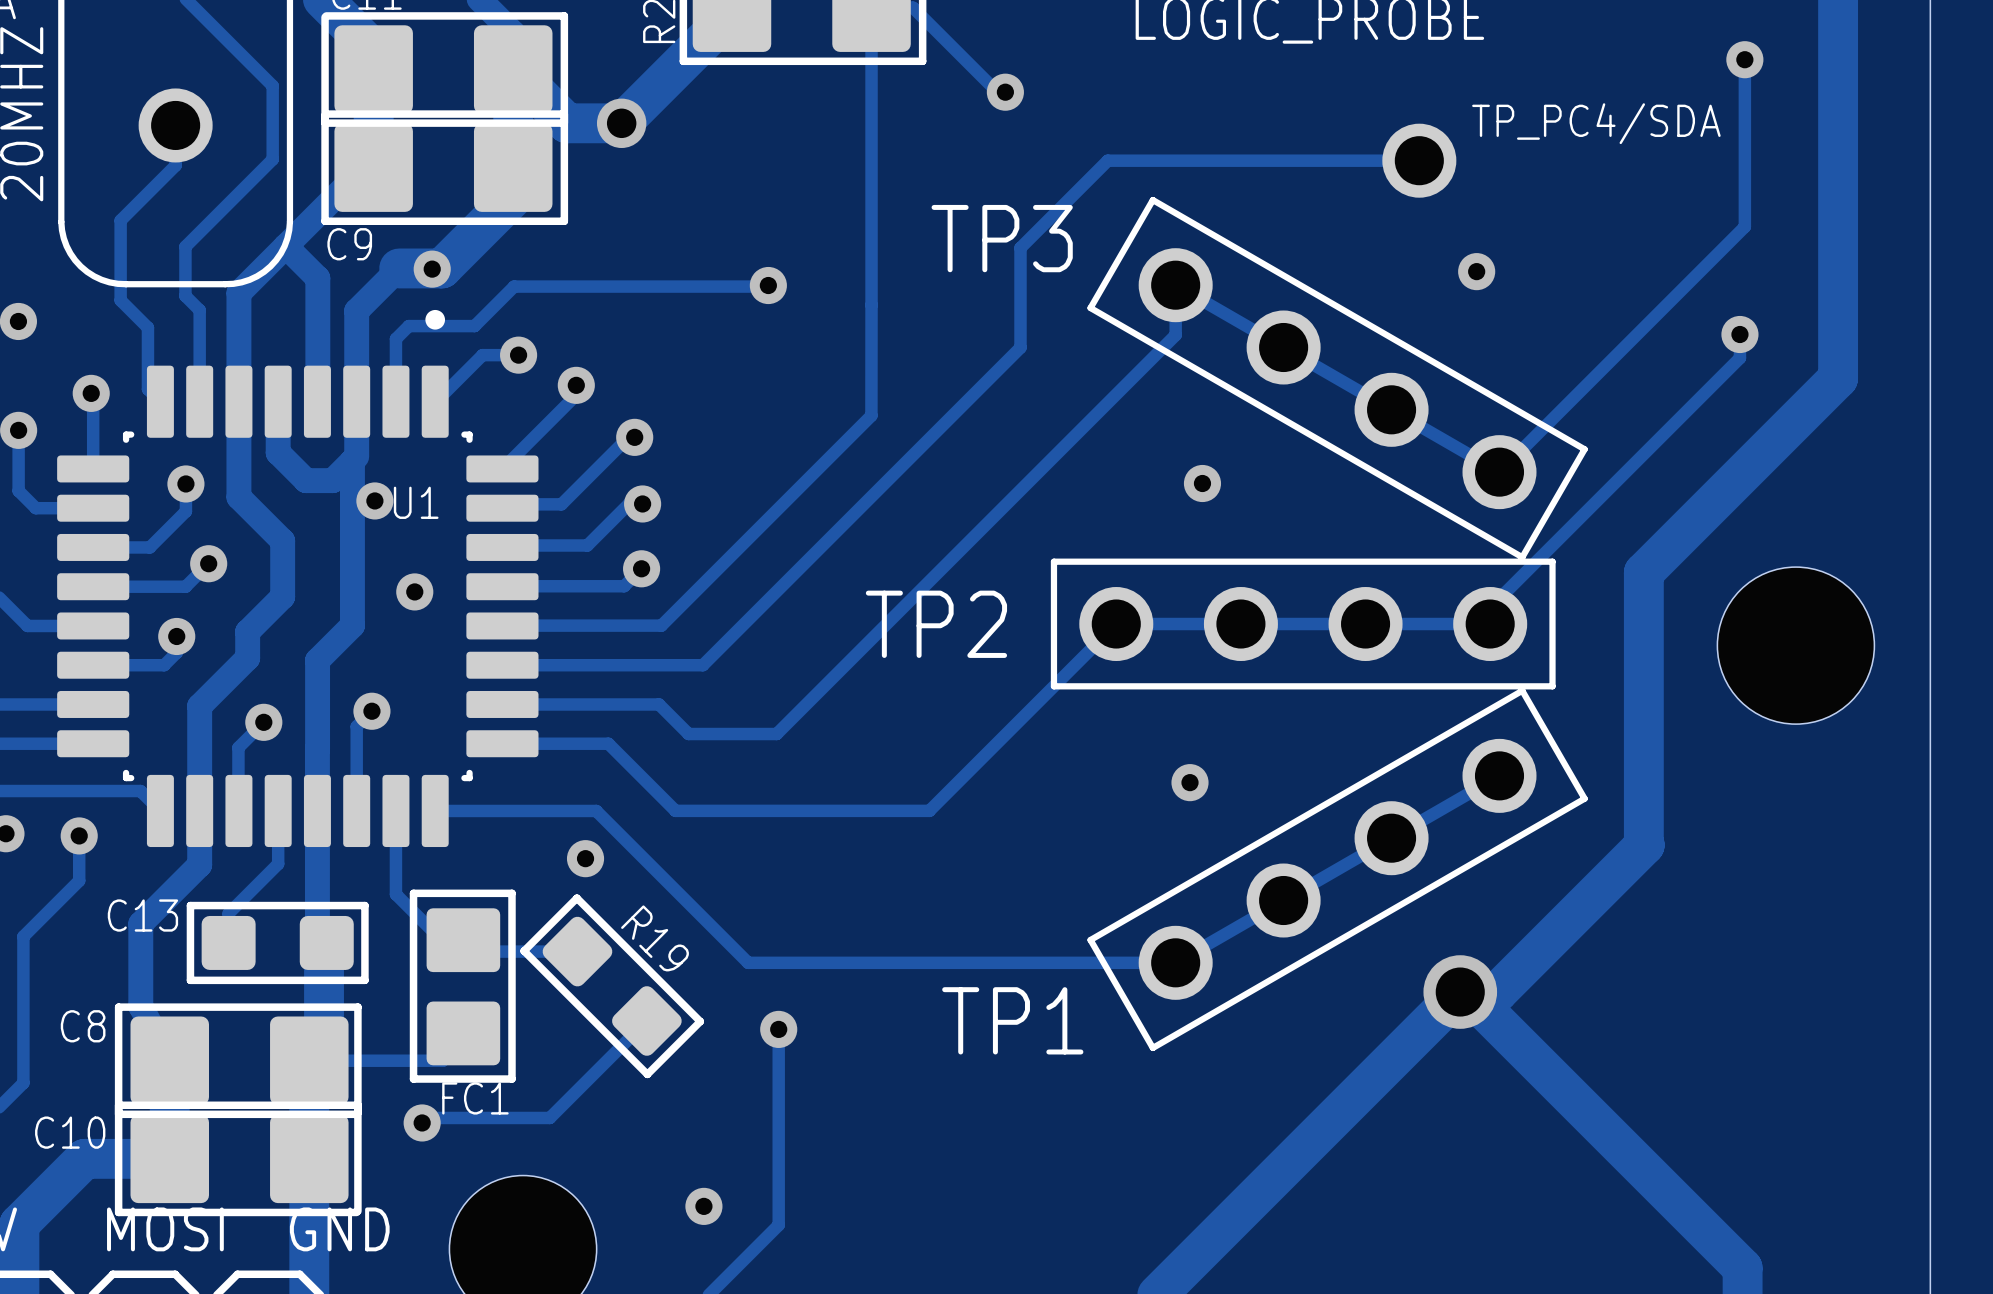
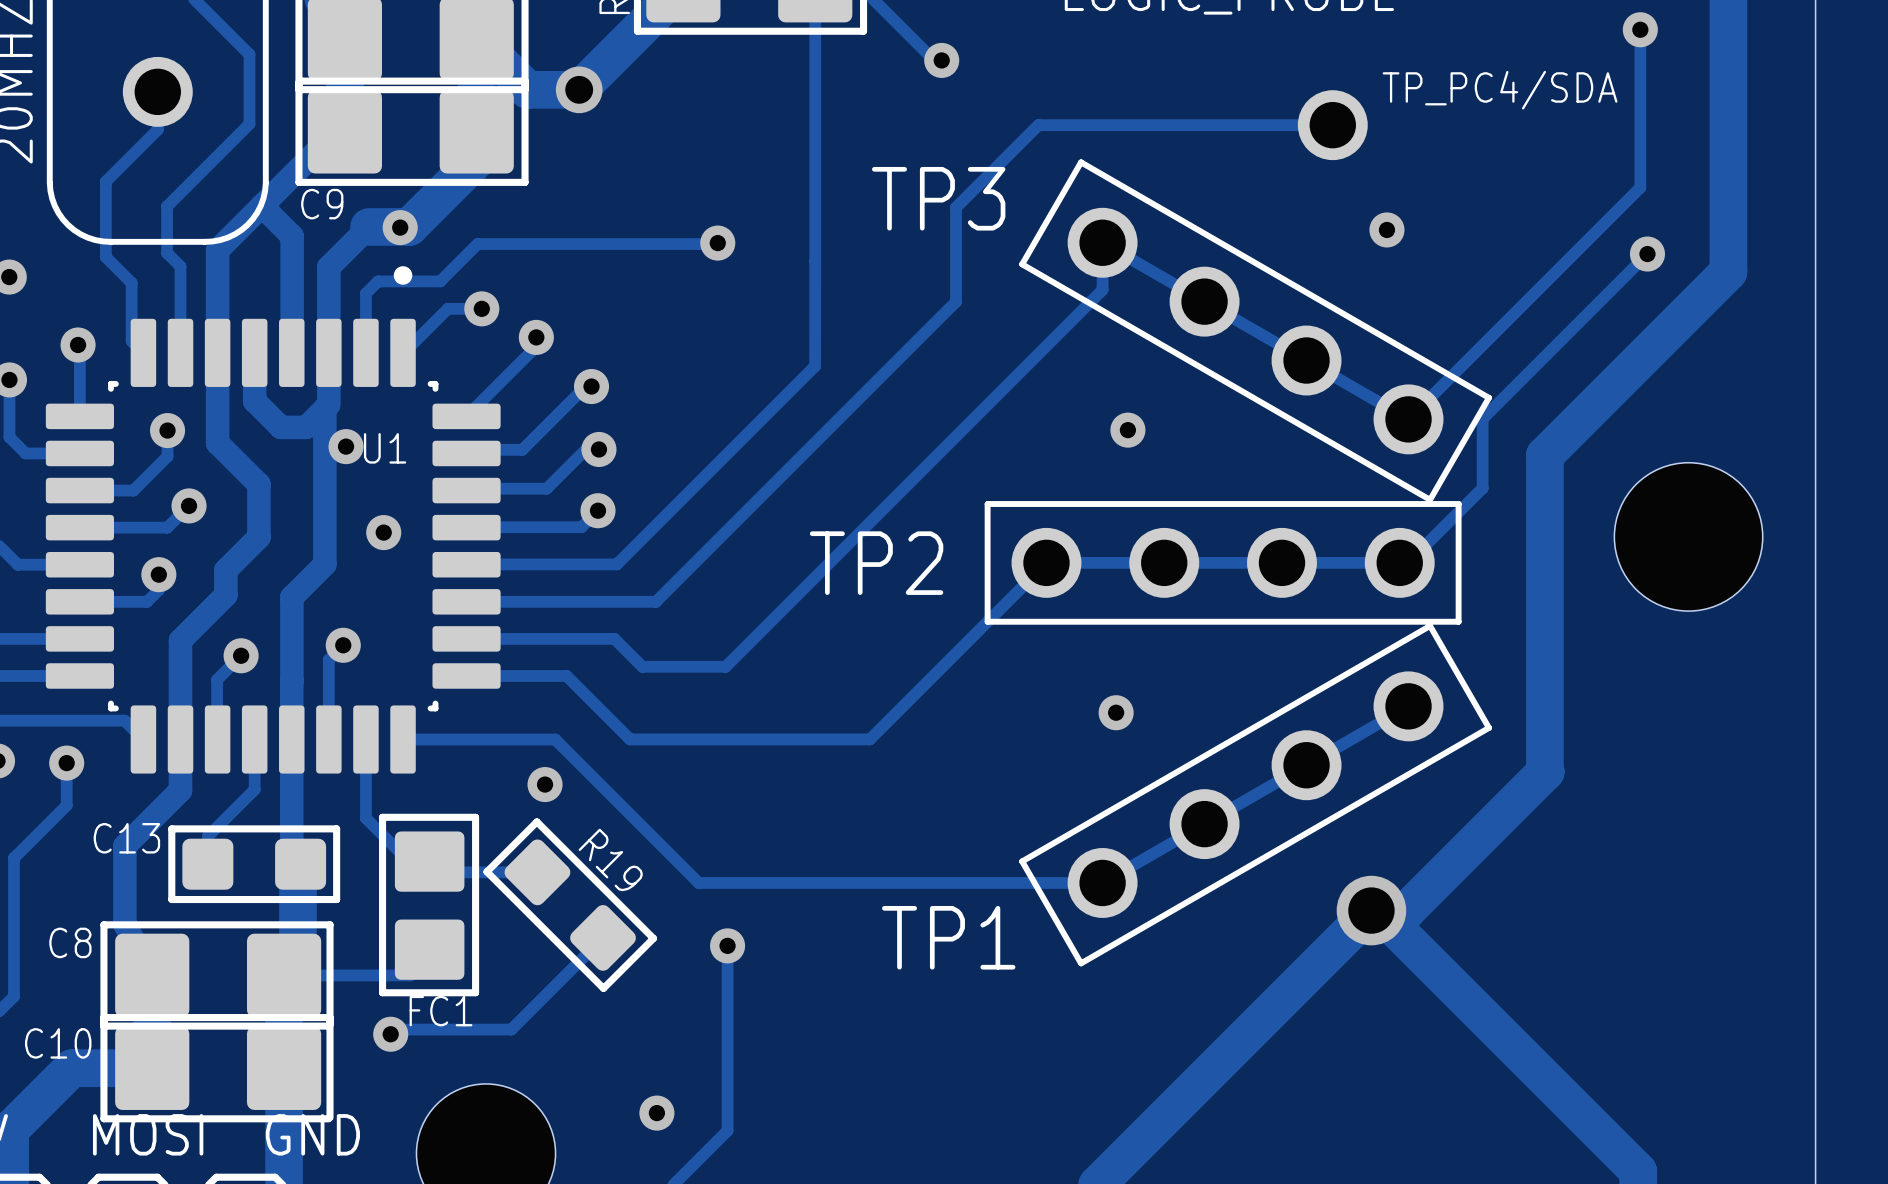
track: (1838, 316) (1838, 378) (1643, 572) -> (1728, 271) (1544, 455) (1544, 514)
track: (1739, 334) (1739, 358) (1490, 607) (1490, 624) -> (1647, 254) (1482, 418) (1482, 488) (1407, 562) (1399, 562)
via position: (1739, 334) -> (1647, 254)
hole position: (1795, 645) -> (1688, 536)

